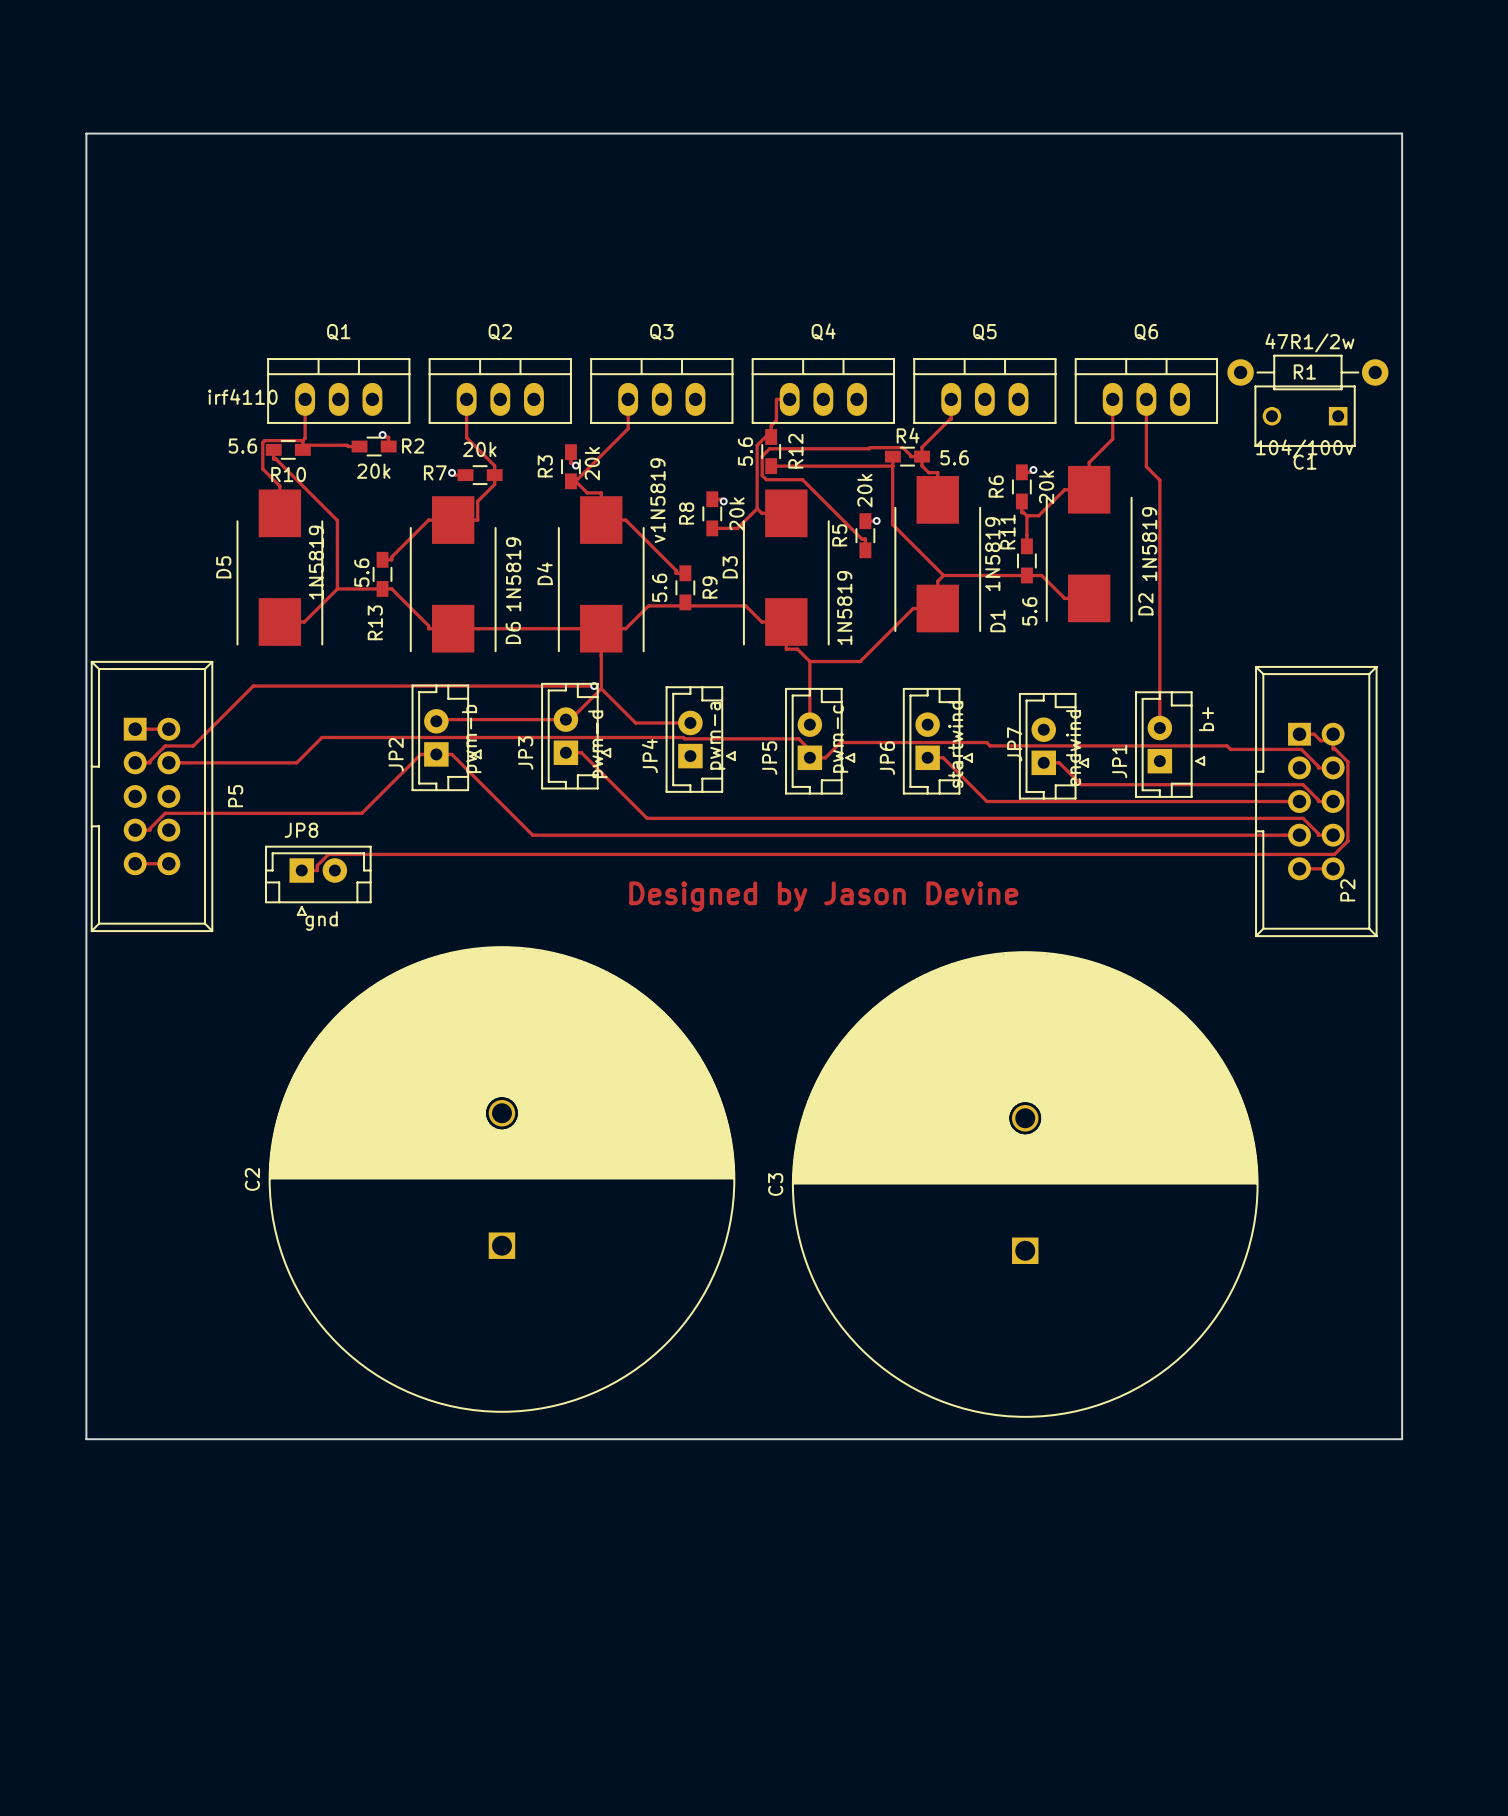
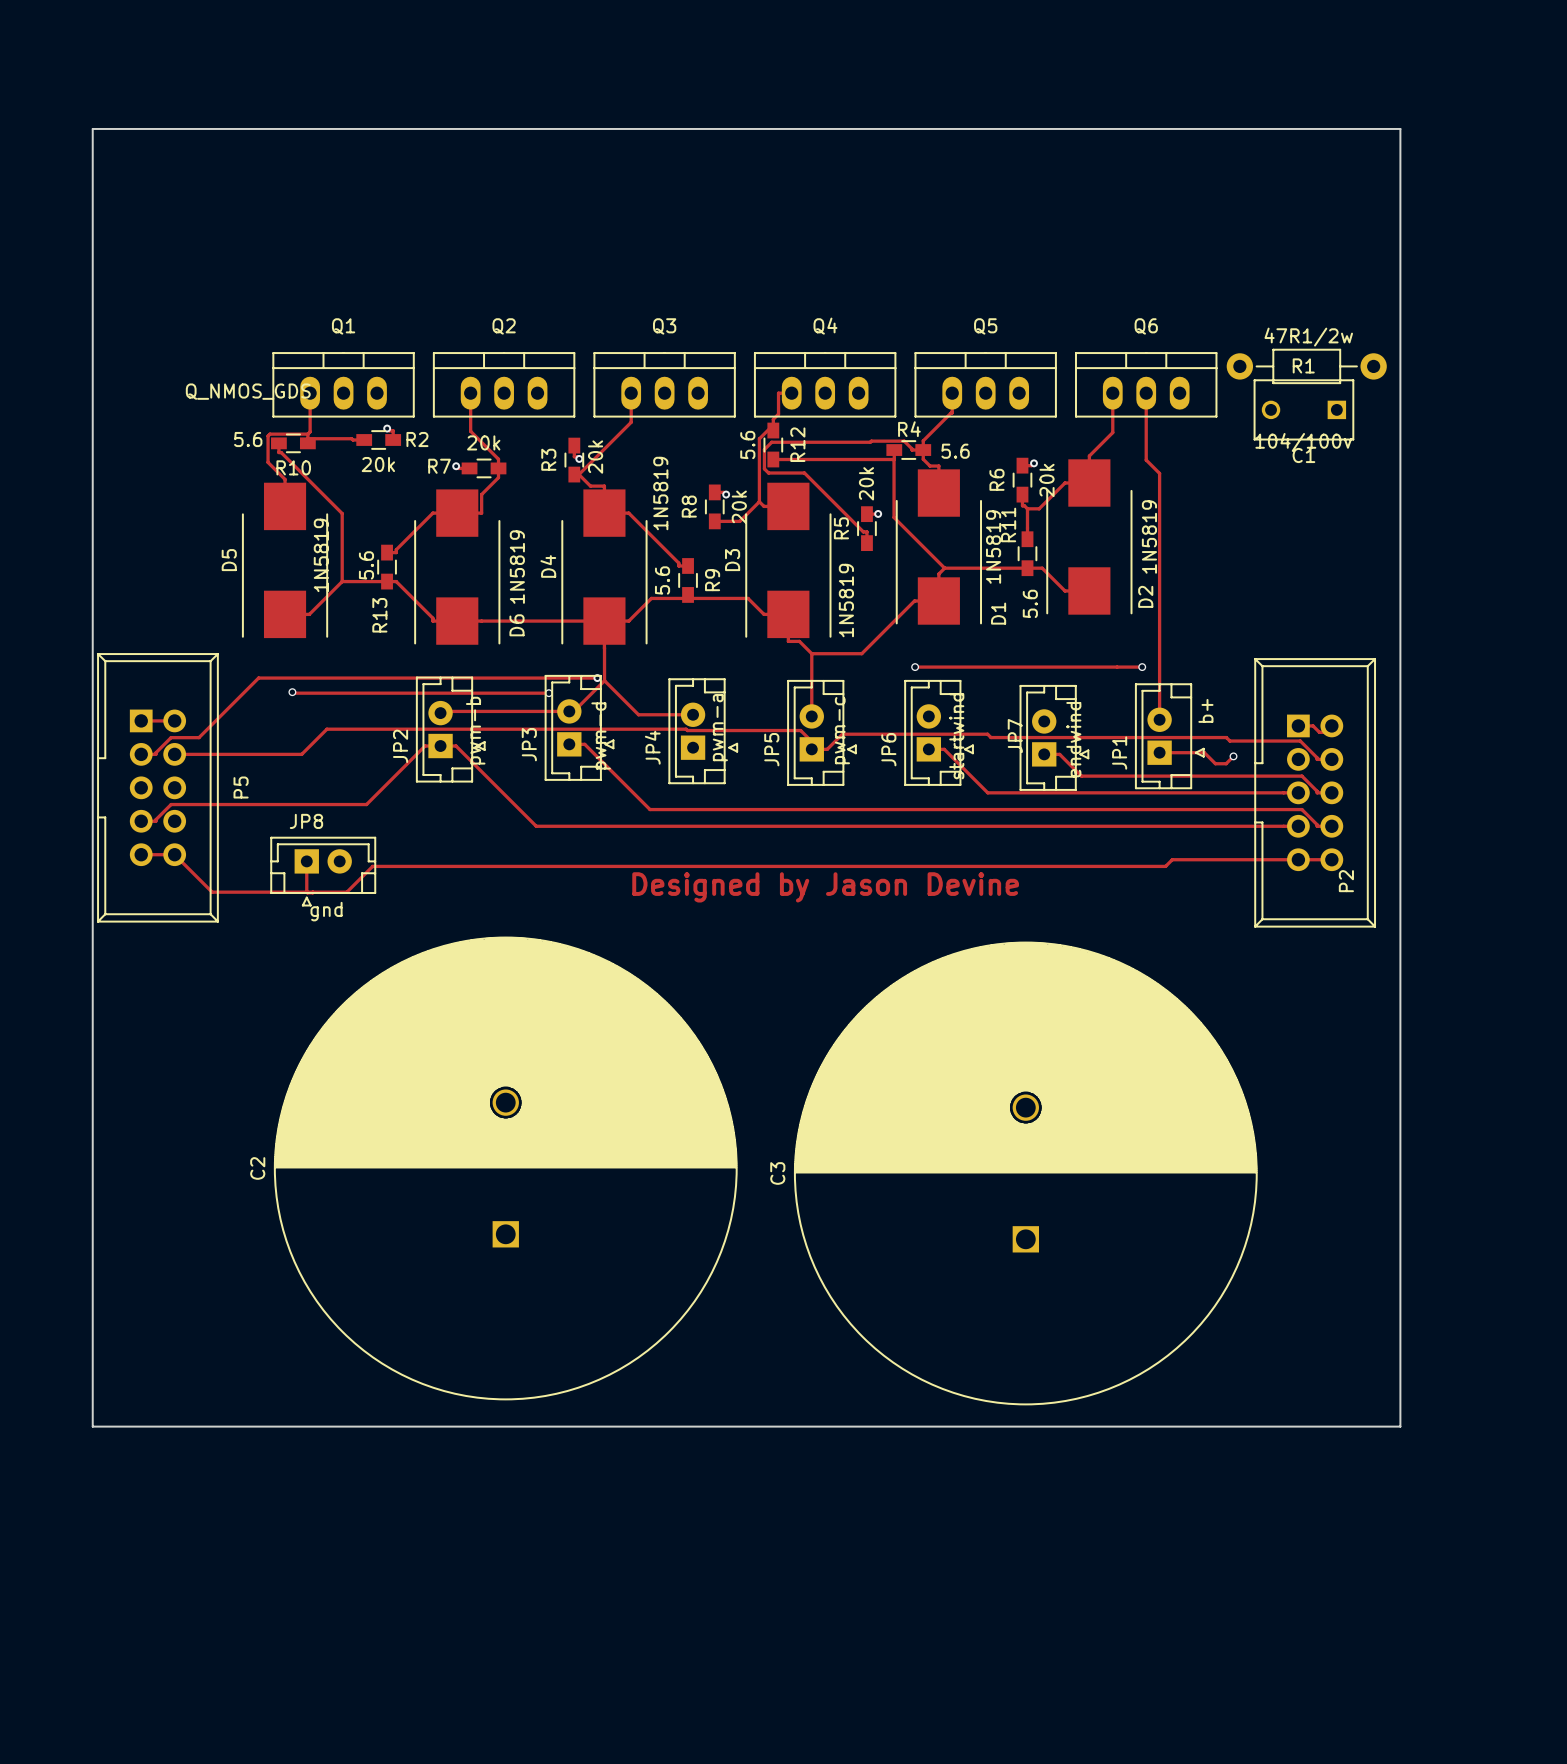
Q1 value: irf4110 (242, 396) -> Q_NMOS_GDS (248, 391)
D4 value: v1N5819 (657, 500) -> 1N5819 (660, 493)
track: none -> (915, 667) (1142, 667)
via: none -> (915, 667)
via: none -> (1142, 667)
track: none -> (292, 692) (548, 693)
via: none -> (292, 692)
via: none -> (548, 693)
track: (1333, 740) (1333, 748) (1347, 761) (1347, 841) (1334, 854) (328, 854) (317, 865) (317, 870) (301, 870) -> (312, 892) (306, 892) (306, 861)
track: none -> (1159, 752) (1204, 752) (1215, 763) (1226, 763) (1233, 756)
via: none -> (1233, 756)
track: none -> (174, 854) (212, 892) (346, 892) (372, 866) (1165, 866) (1172, 859) (1298, 859)

